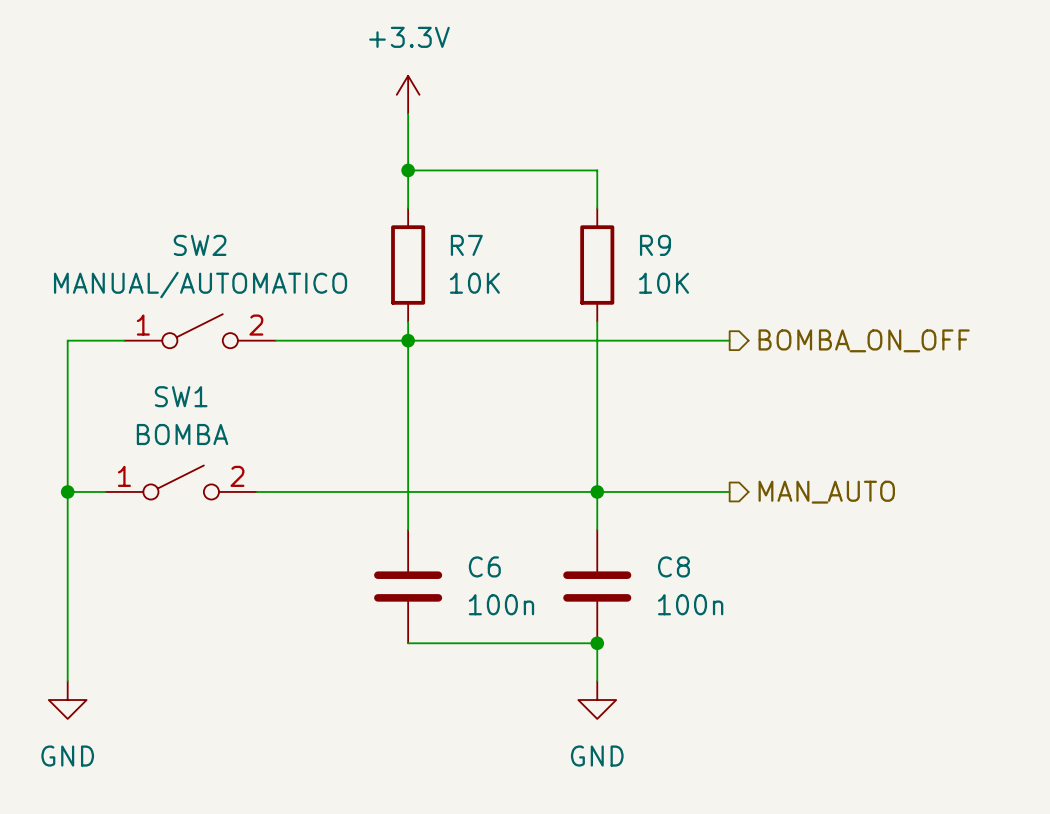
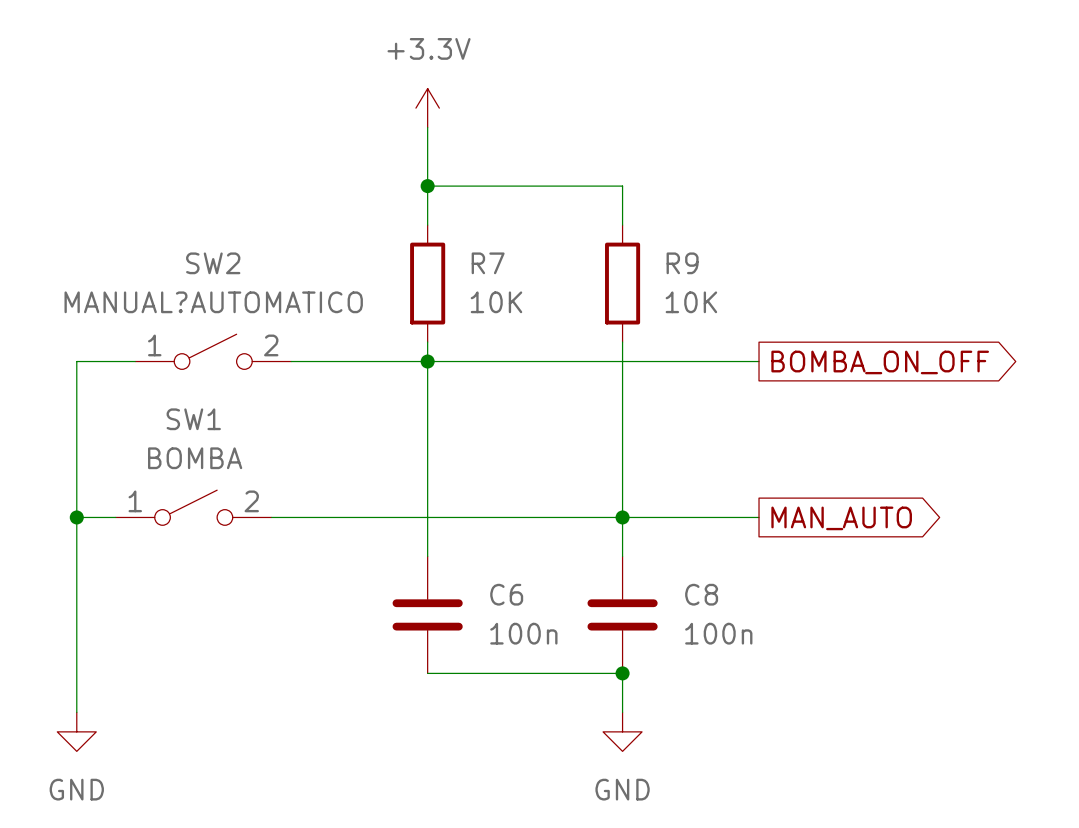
SW2 value: MANUAL/AUTOMATICO (200, 285) -> MANUAL?AUTOMATICO (213, 302)
hierarchical label: BOMBA_ON_OFF (864, 340) -> none
global label: none -> BOMBA_ON_OFF (880, 362)
global label: none -> MAN_AUTO (841, 518)
hierarchical label: MAN_AUTO (826, 492) -> none

